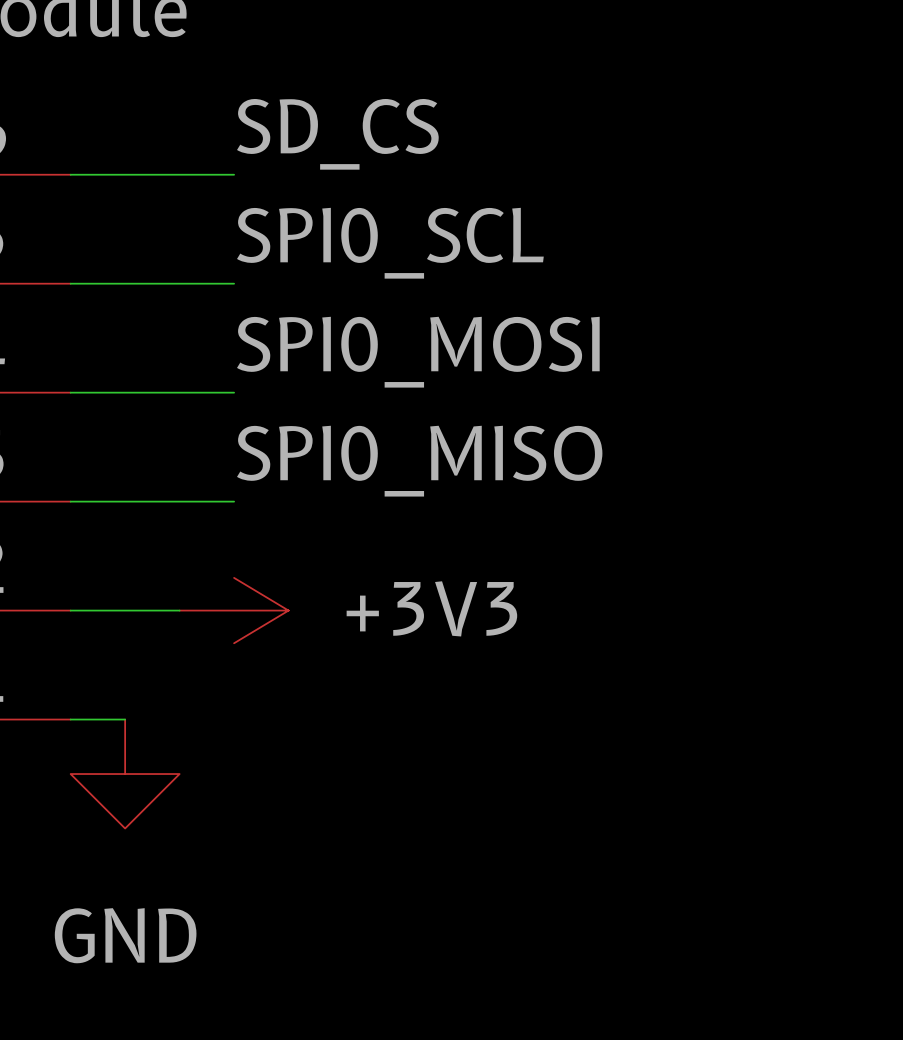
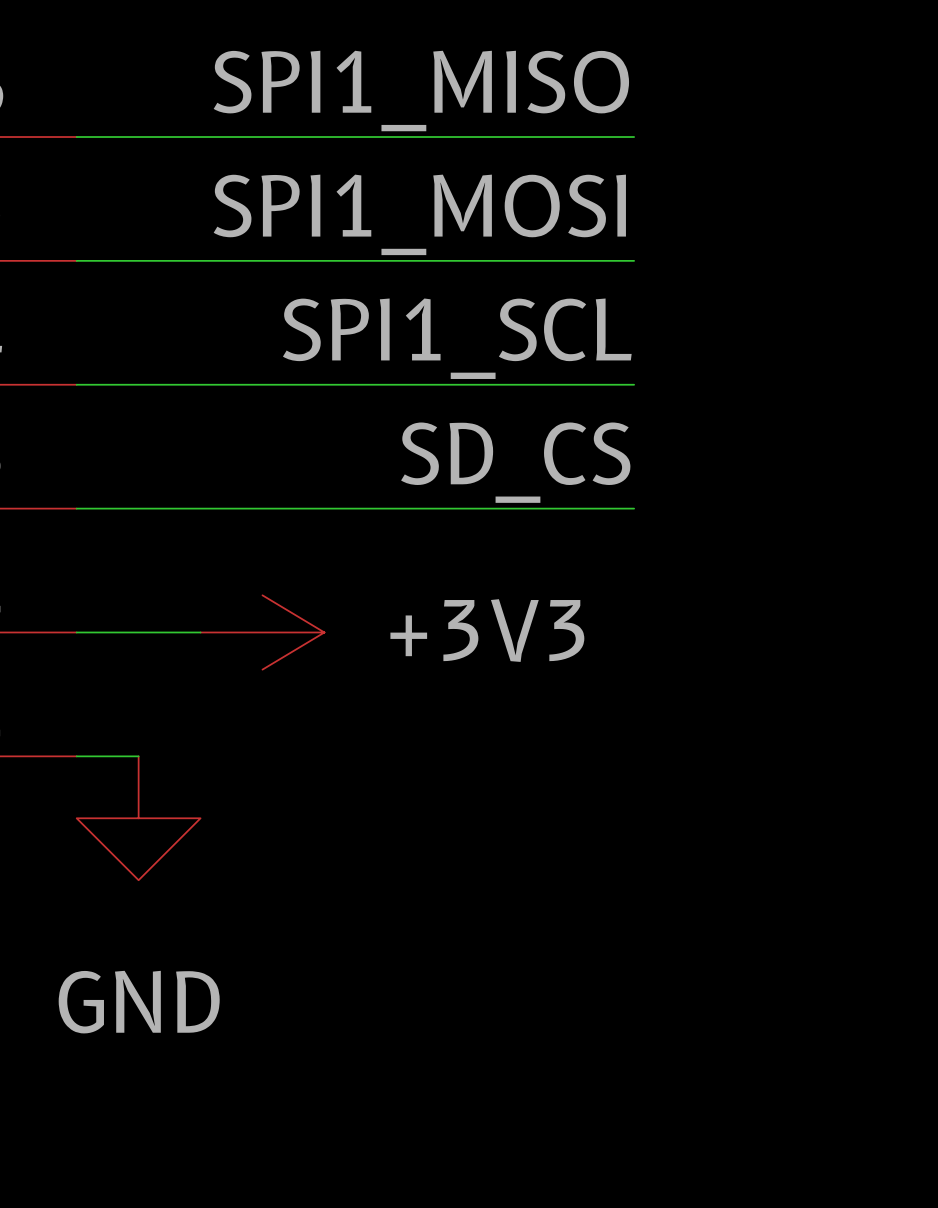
label position: SD_CS (337, 134) -> SD_CS (515, 462)
label: none -> SPI1_MISO (421, 91)
wire: none -> (262, 137) (634, 137)
label: SPI0_SCL (390, 243) -> SPI1_SCL (457, 338)
wire: none -> (262, 260) (634, 260)
label: SPI0_MOSI (418, 352) -> SPI1_MOSI (419, 214)
wire: none -> (262, 384) (634, 384)
label: SPI0_MISO (419, 461) -> none
wire: none -> (262, 508) (634, 508)

